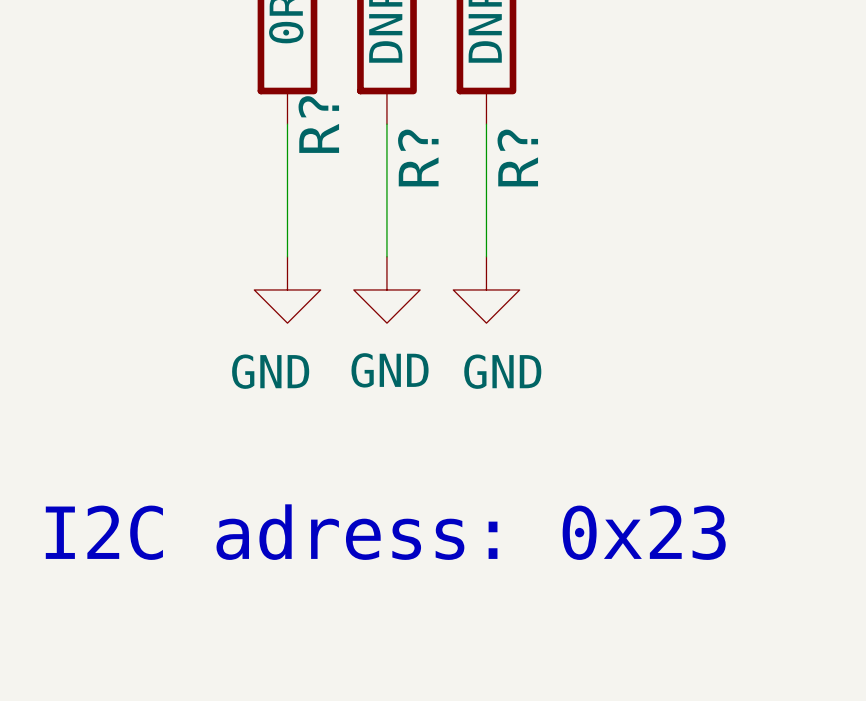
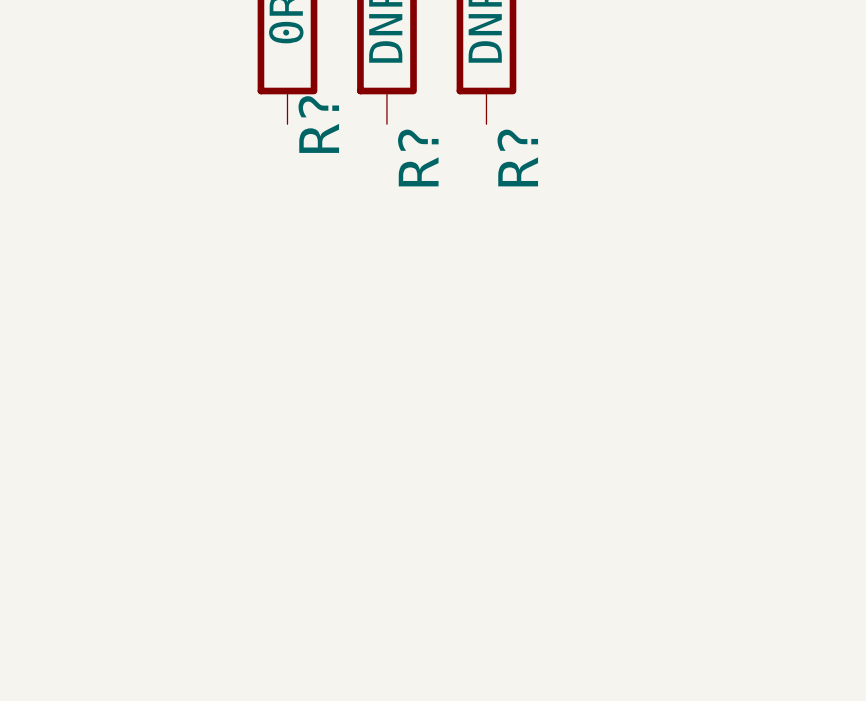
wire: (287, 124) (287, 256) -> none
wire: (386, 124) (386, 256) -> none
wire: (486, 124) (486, 256) -> none
power symbol: GND (287, 289) -> none
power symbol: GND (386, 289) -> none
power symbol: GND (486, 289) -> none
text: I2C adress: 0x23 (385, 532) -> none

